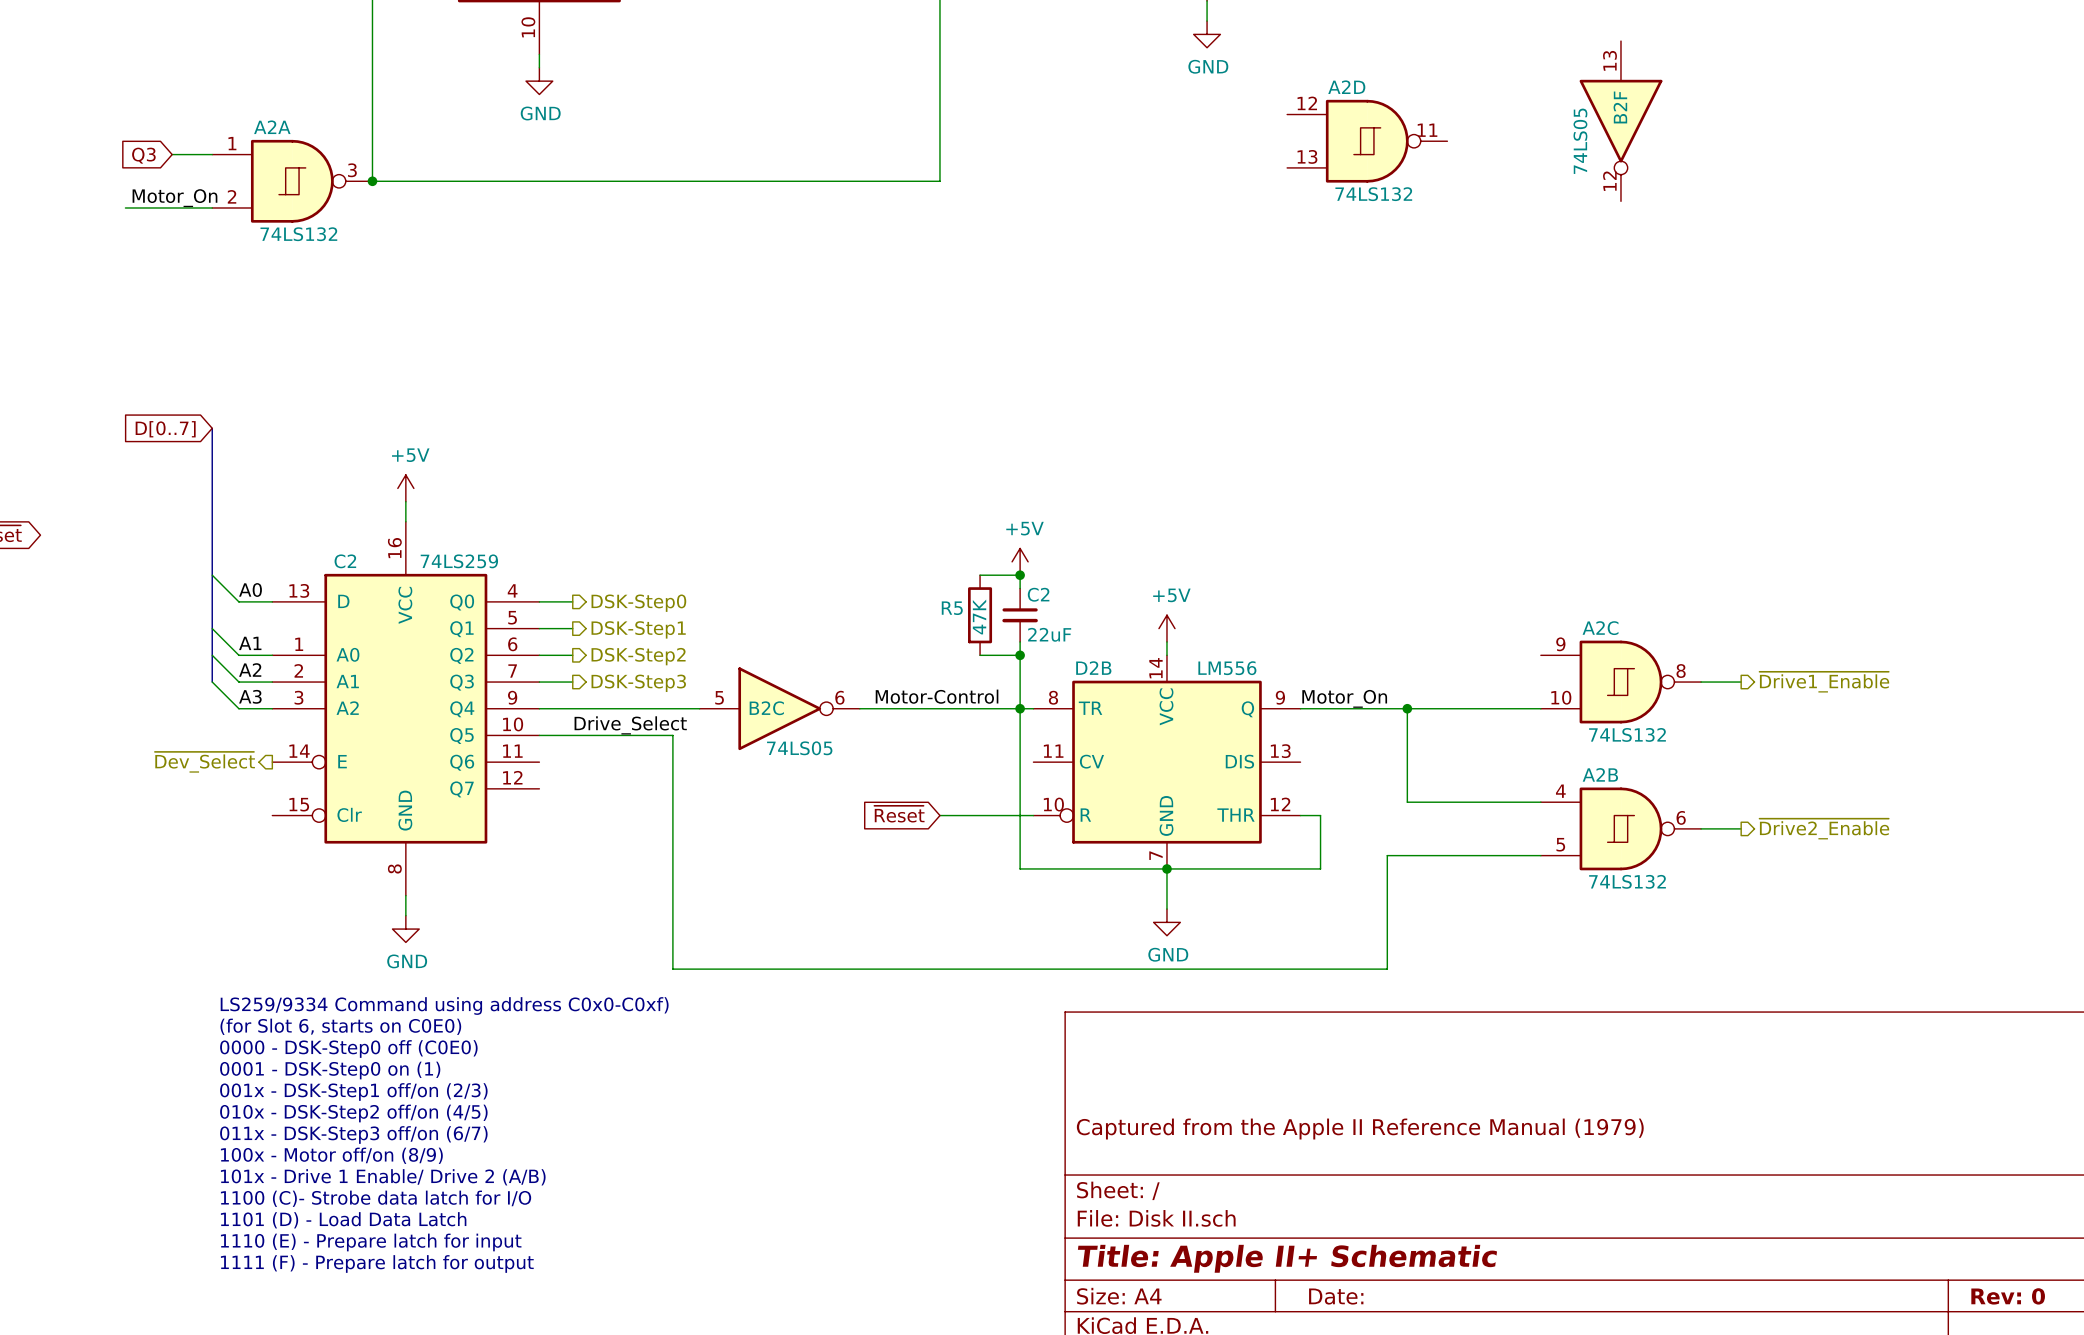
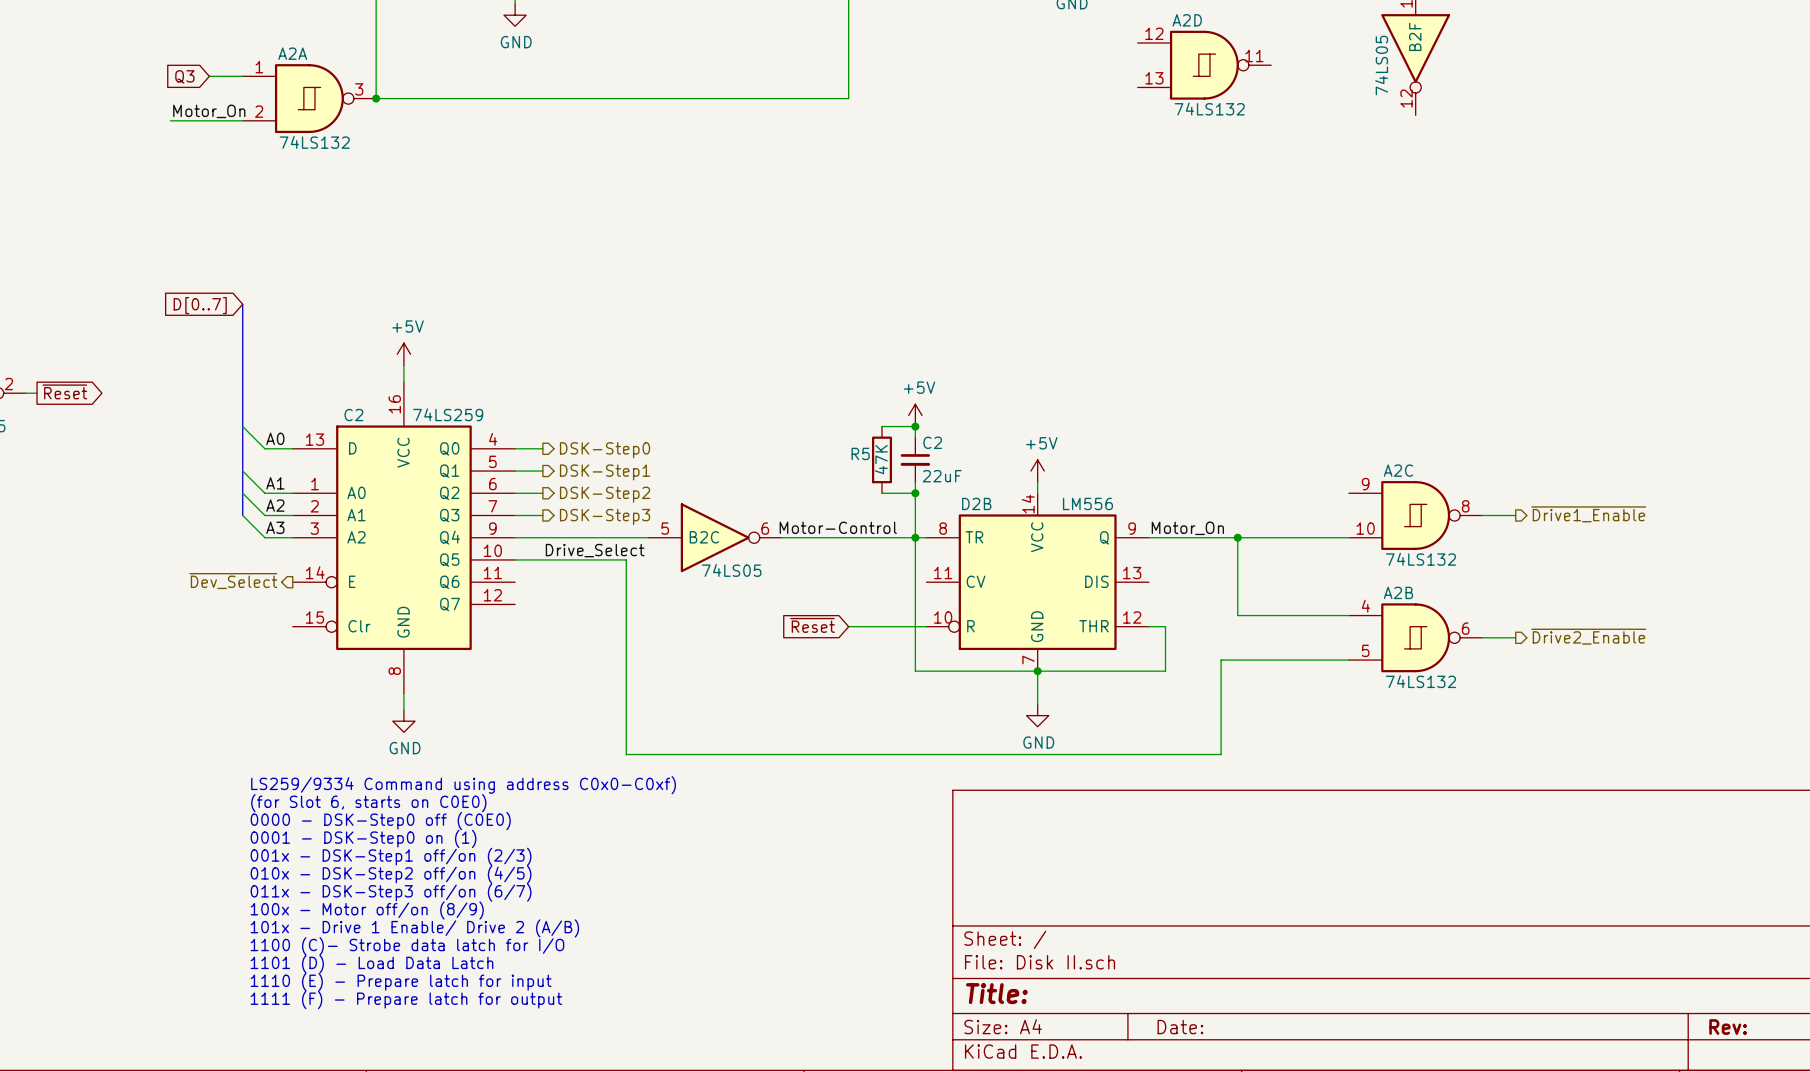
title block: Captured from the Apple II Reference Manual (1979) (1360, 1129) -> none
title block: Title: Apple II+ Schematic (1287, 1258) -> Title: (996, 993)
title block: Rev: 0 (2008, 1296) -> Rev: (1728, 1027)

